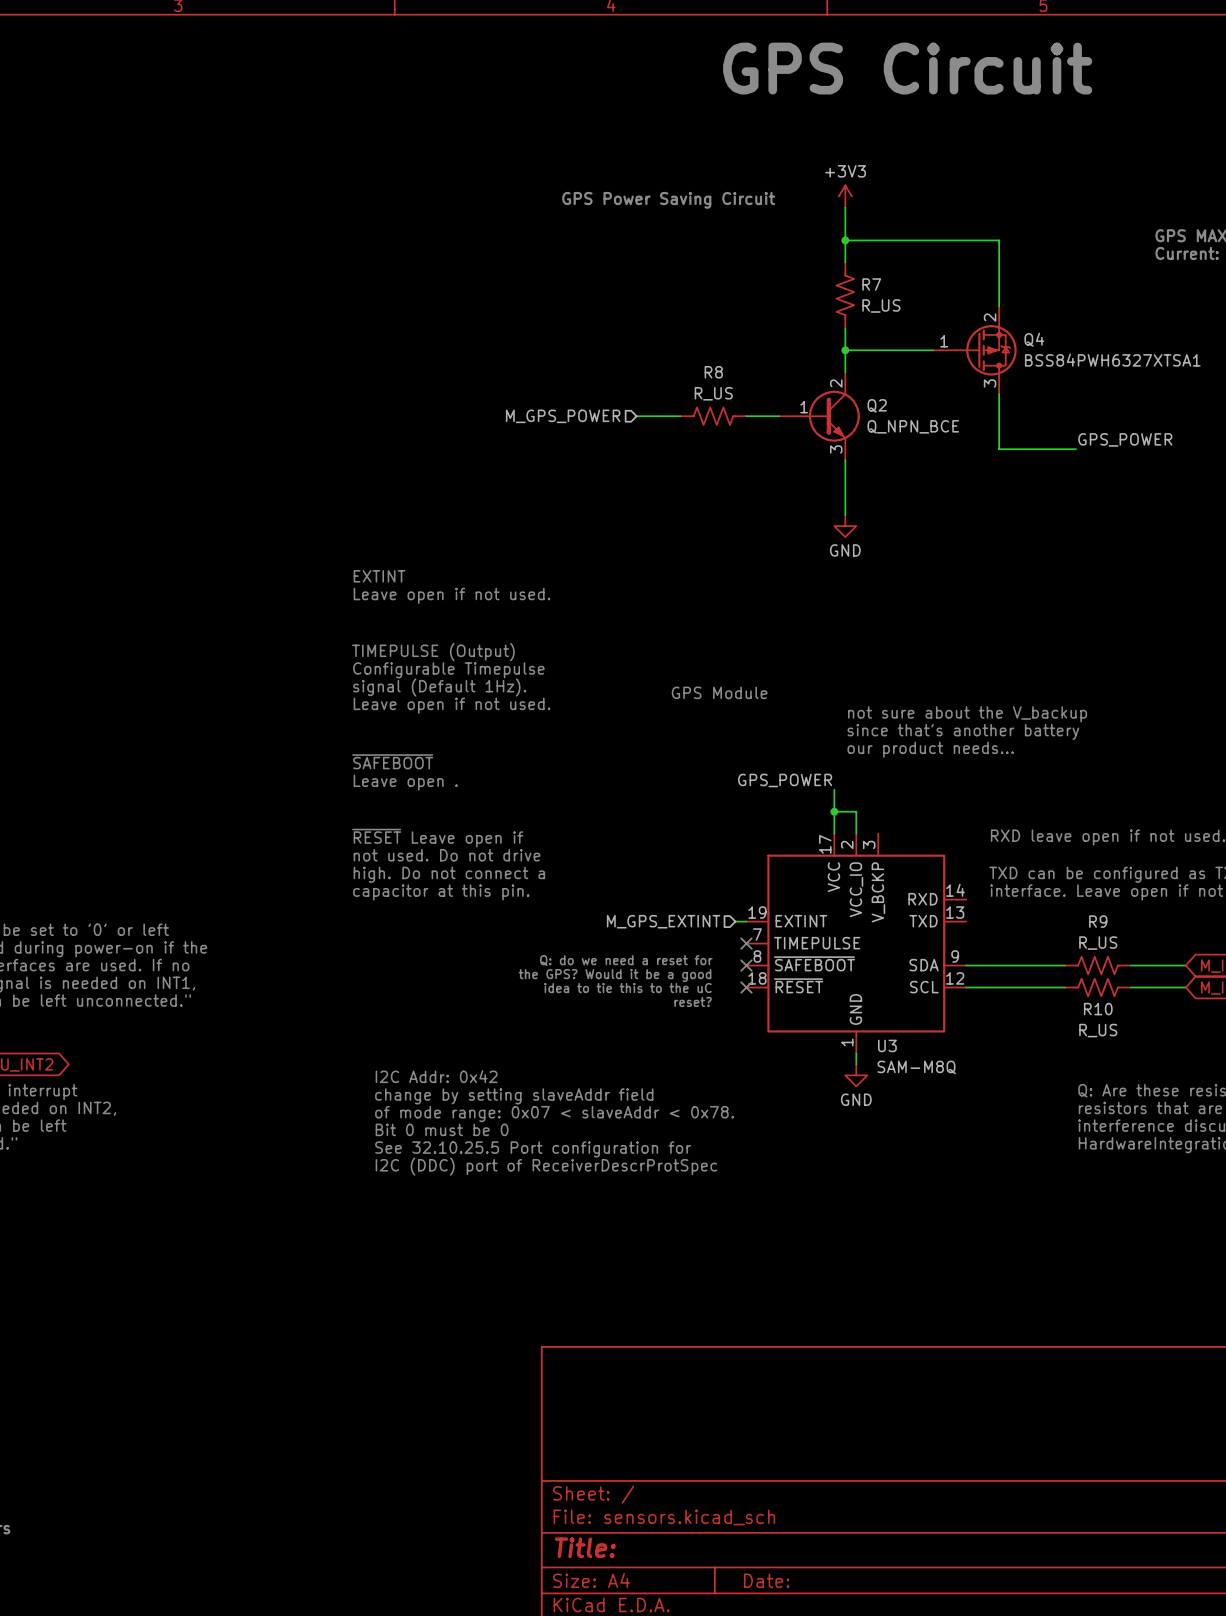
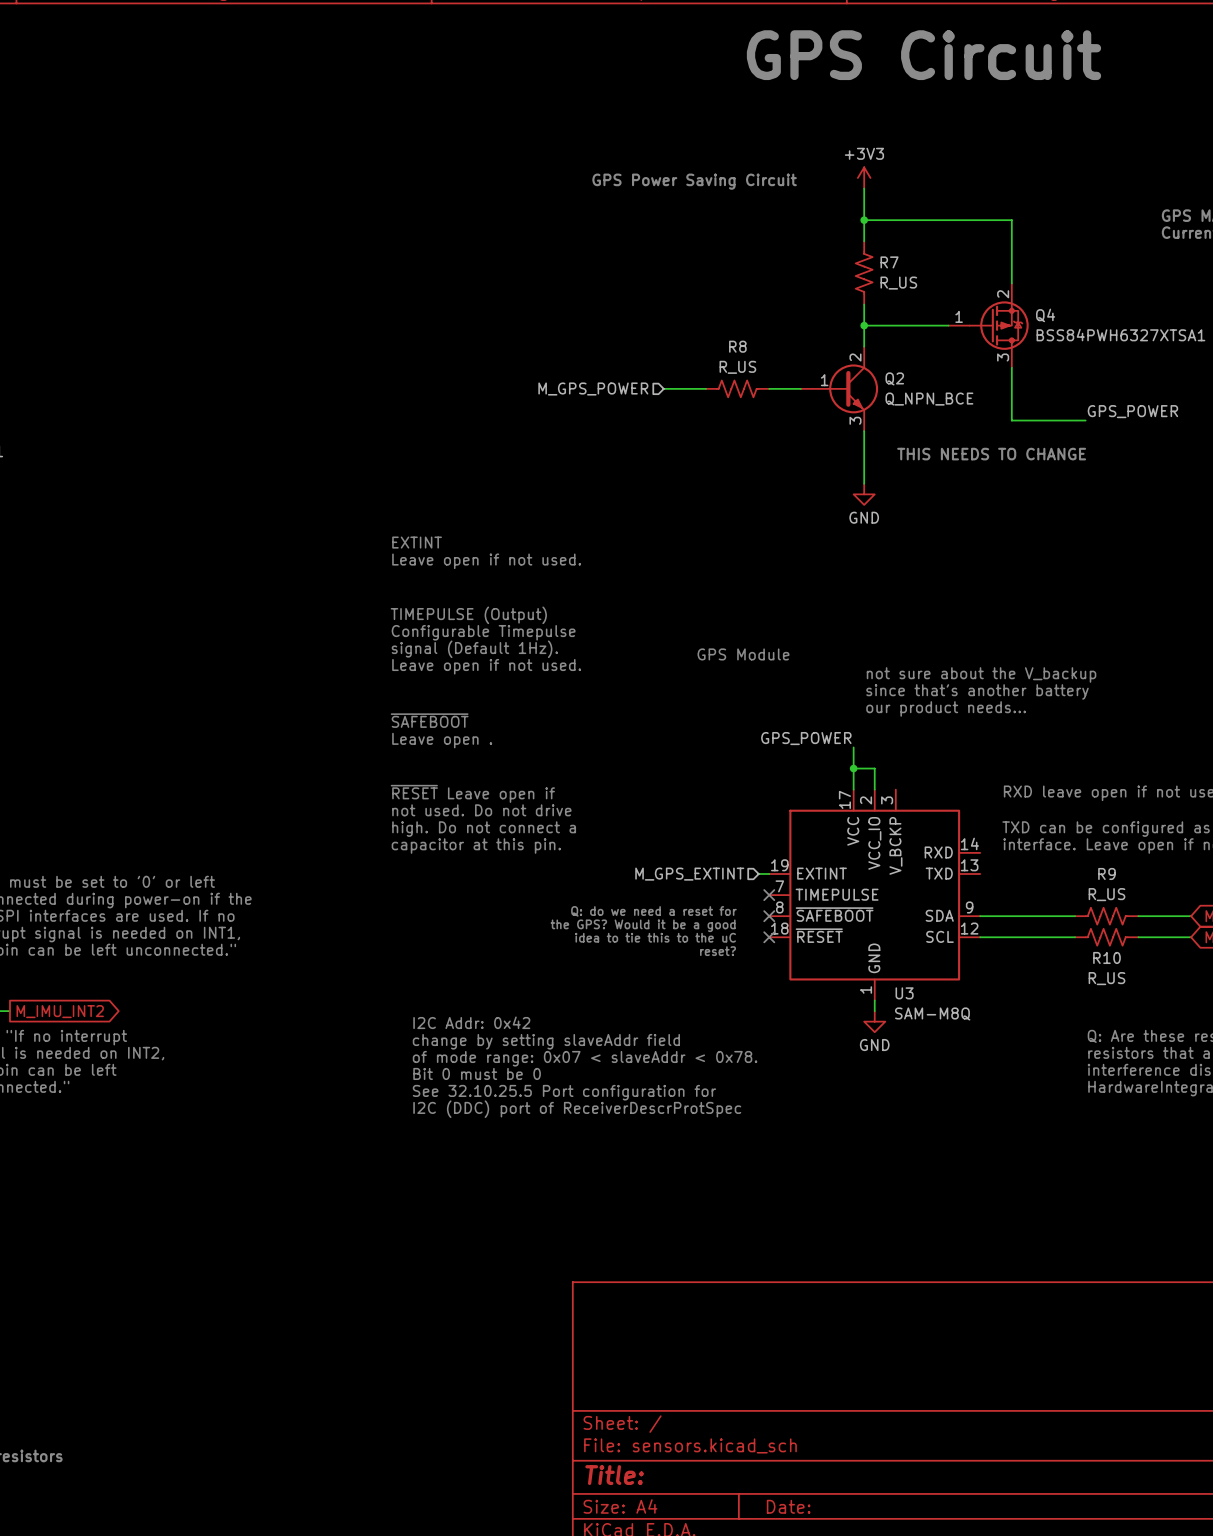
text: none -> THIS NEEDS TO CHANGE (991, 454)

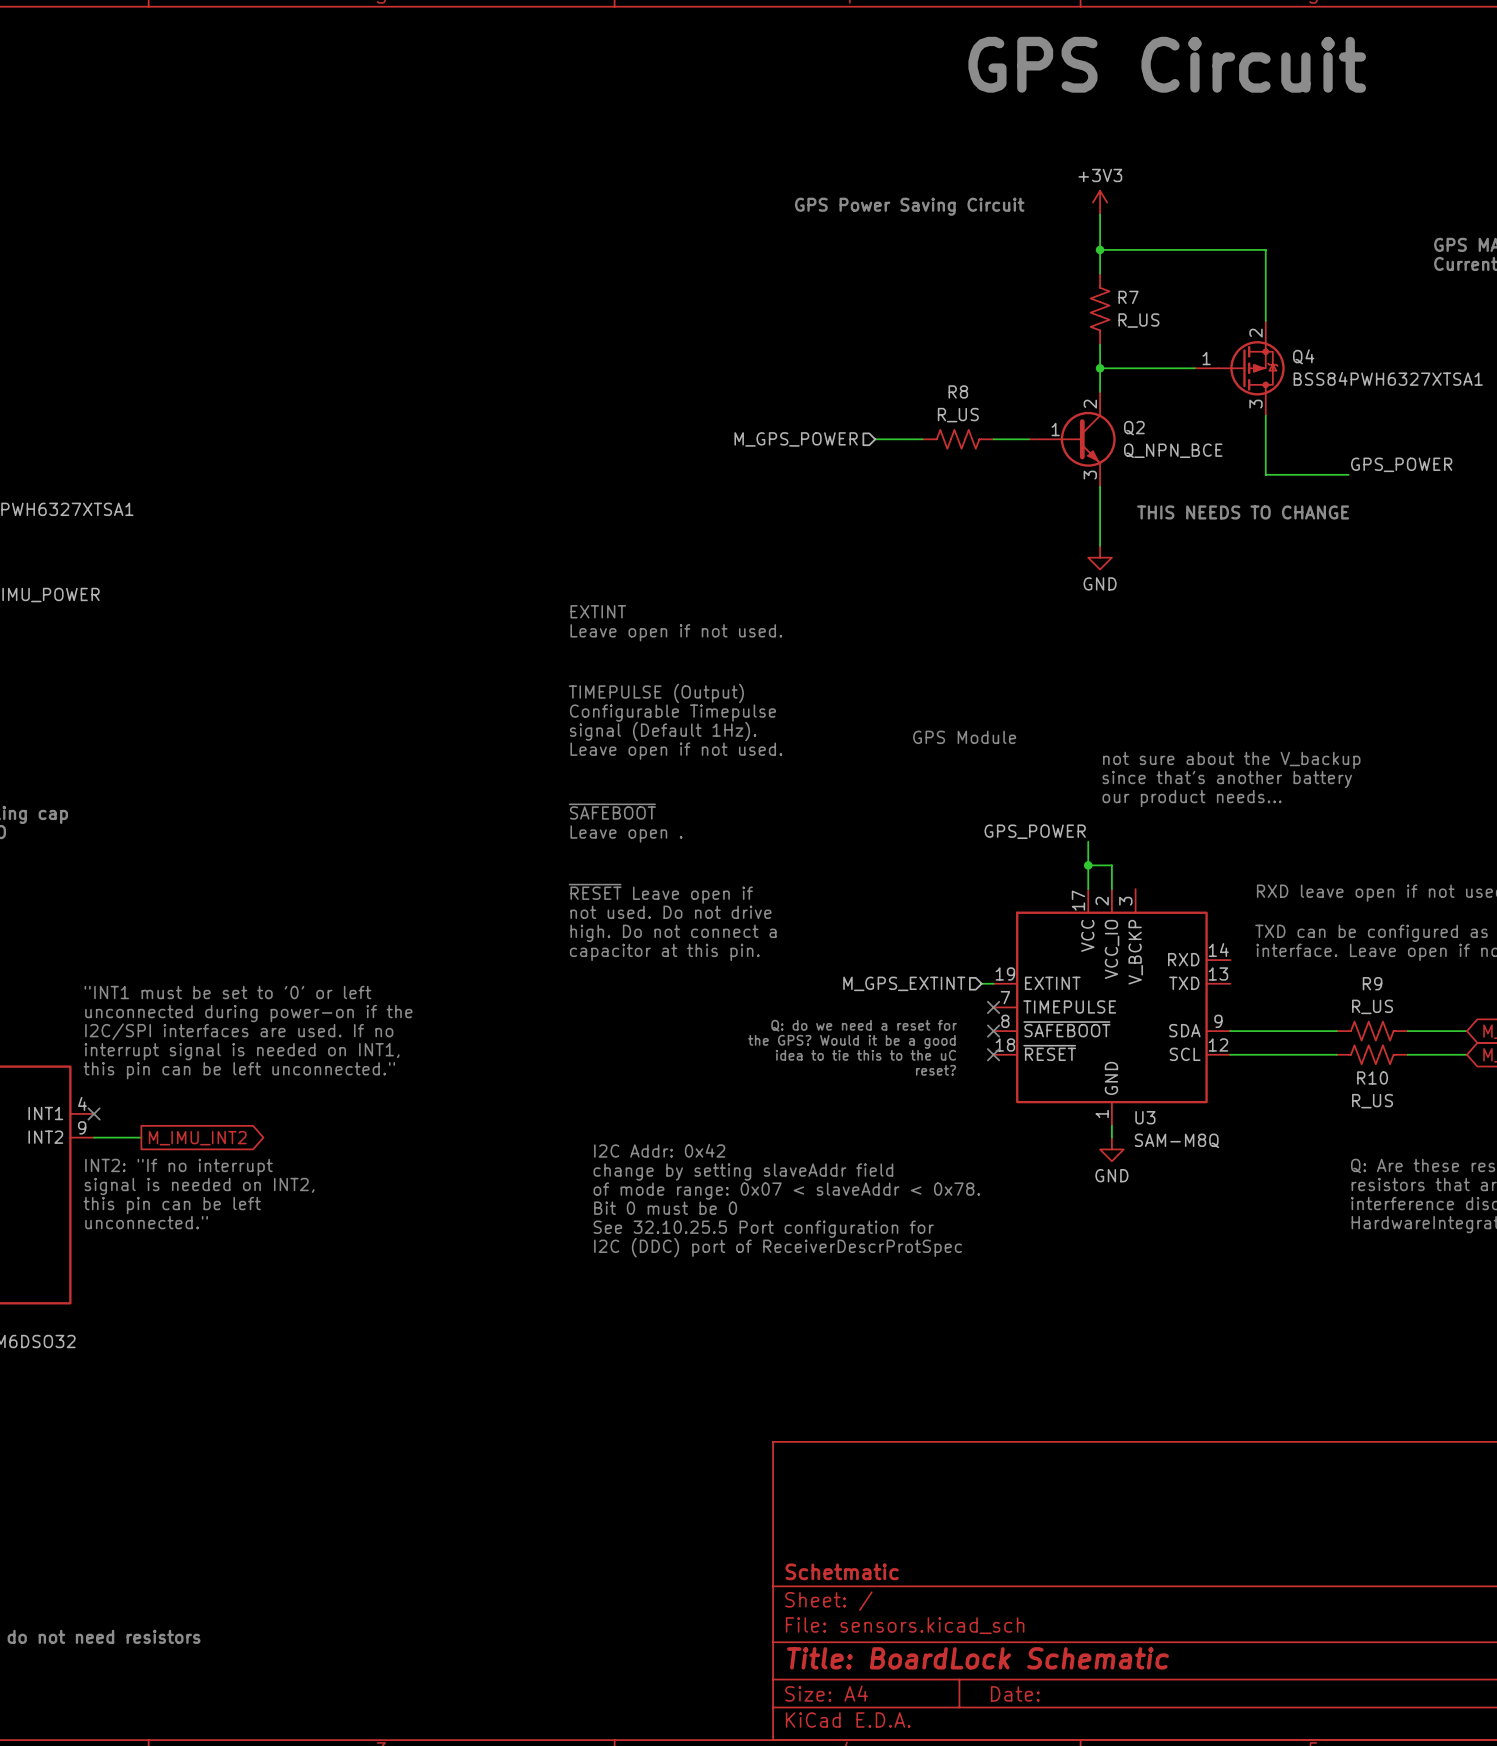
title block: none -> Schetmatic (842, 1571)
title block: Title: (614, 1475) -> Title: BoardLock Schematic (977, 1658)

